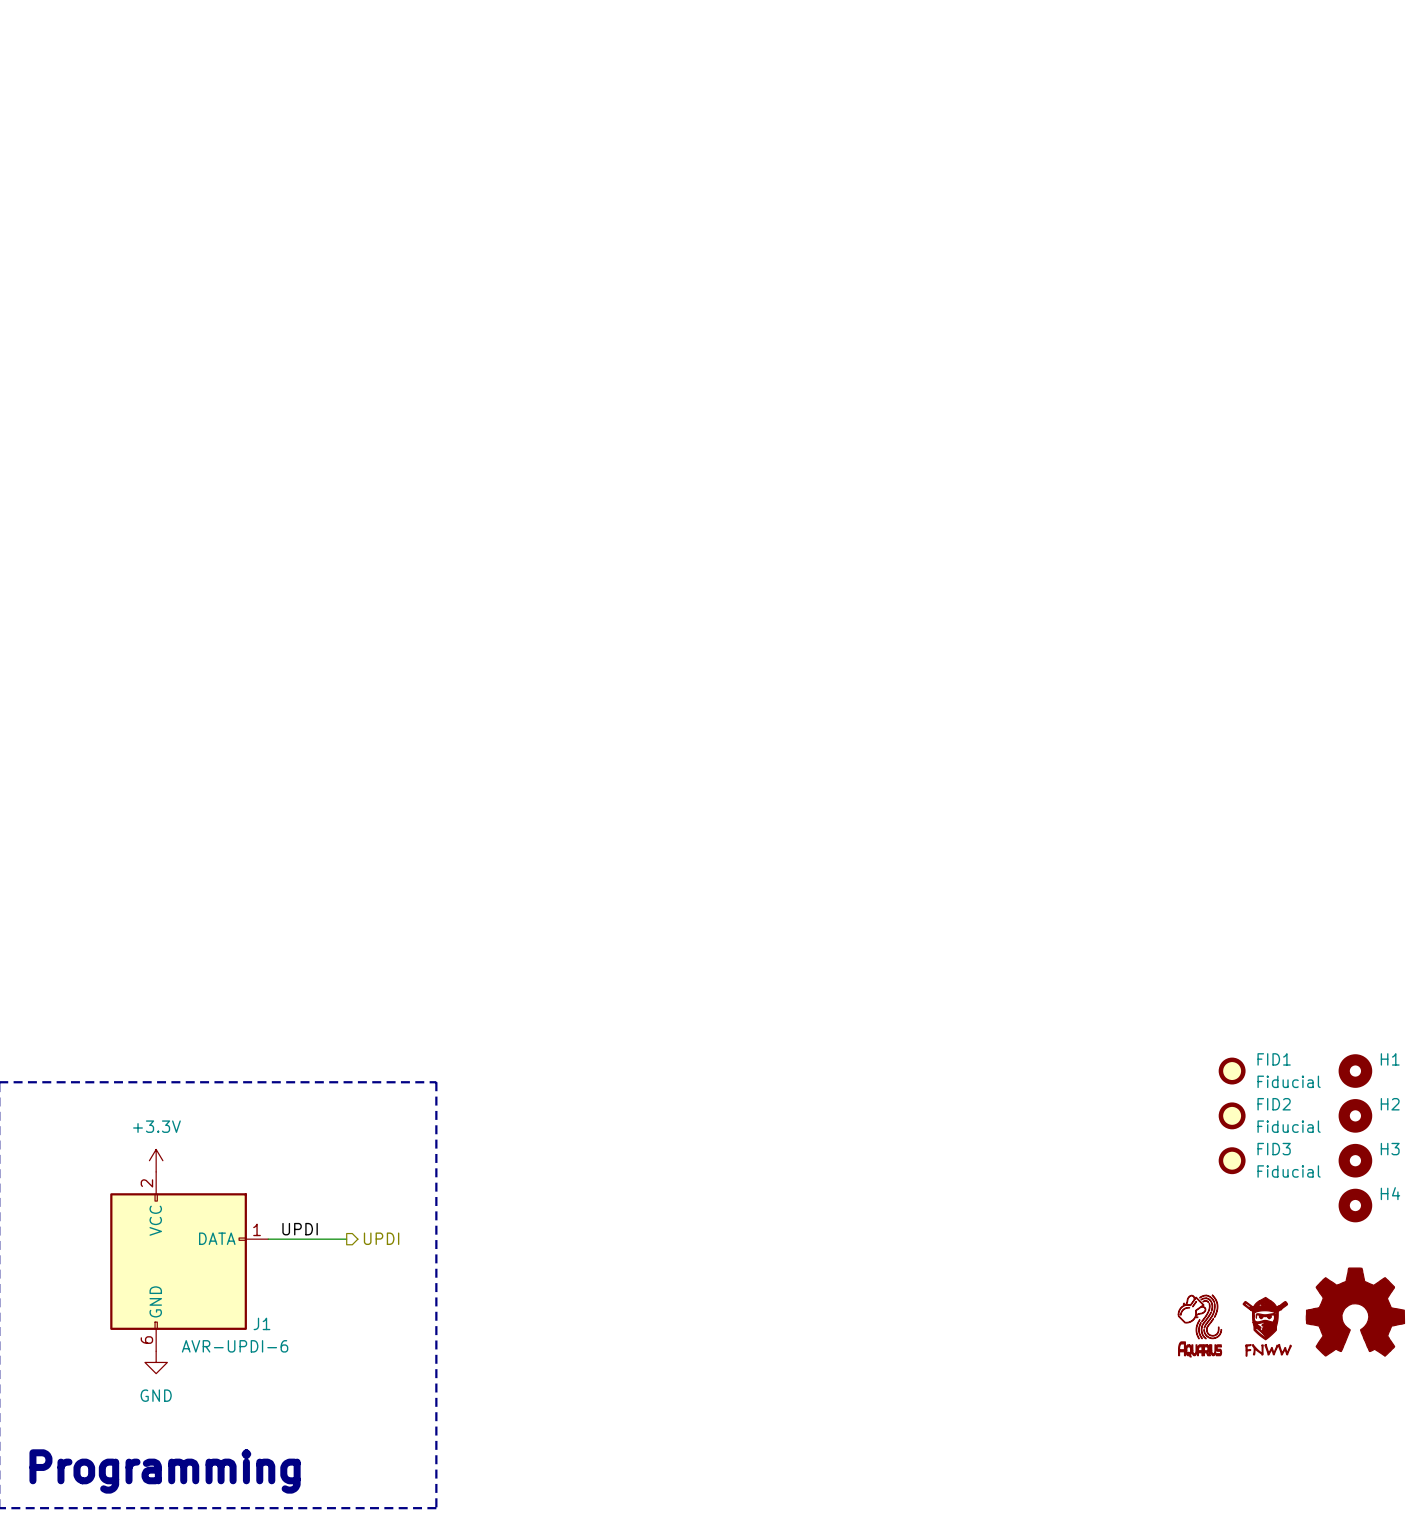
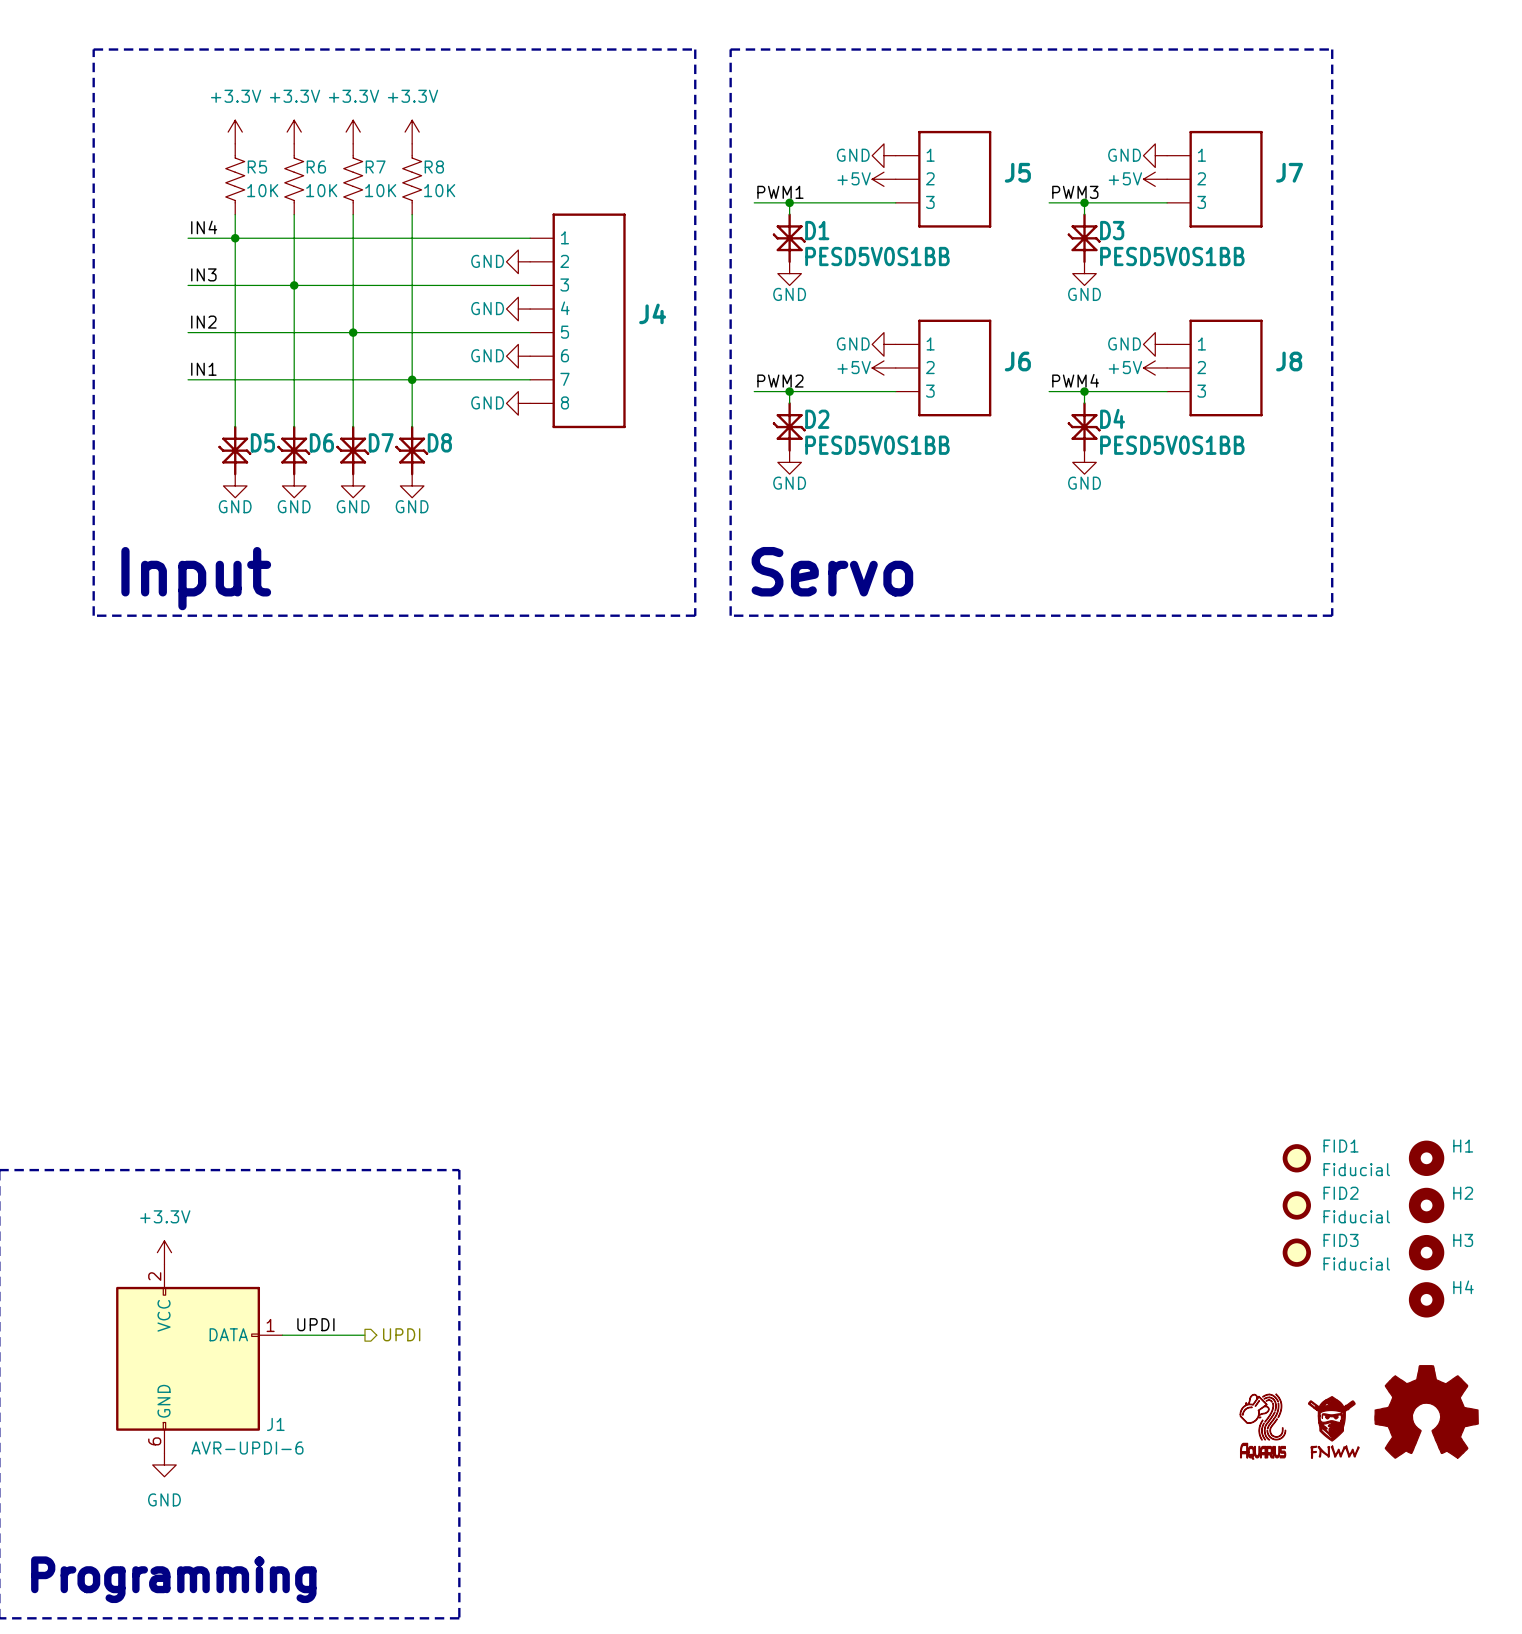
line: none -> (93, 49) (695, 49) (695, 615) (93, 615) (93, 49)
line: none -> (730, 49) (1332, 49) (1332, 615) (730, 615) (730, 49)
power symbol: none -> +3.3V (235, 132)
power symbol: none -> +3.3V (294, 132)
power symbol: none -> +3.3V (353, 132)
power symbol: none -> +3.3V (412, 132)
power symbol: none -> GND (883, 155)
power symbol: none -> GND (1155, 155)
R5: none -> 10K (235, 179)
R6: none -> 10K (294, 179)
R7: none -> 10K (353, 179)
R8: none -> 10K (412, 179)
power symbol: none -> +5V (883, 179)
J5: none -> (943, 179)
power symbol: none -> +5V (1155, 179)
J7: none -> (1214, 179)
label: none -> PWM1 (780, 192)
label: none -> PWM3 (1075, 192)
wire: none -> (754, 202) (895, 202)
wire: none -> (789, 202) (789, 214)
junction: none -> (789, 202)
wire: none -> (1049, 202) (1167, 202)
wire: none -> (1084, 202) (1084, 214)
junction: none -> (1084, 202)
wire: none -> (235, 214) (235, 426)
wire: none -> (294, 214) (294, 426)
wire: none -> (353, 214) (353, 426)
wire: none -> (412, 214) (412, 426)
label: none -> IN4 (204, 227)
wire: none -> (188, 238) (530, 238)
junction: none -> (235, 238)
D1: none -> PESD5V0S1BB (789, 238)
D3: none -> PESD5V0S1BB (1084, 238)
power symbol: none -> GND (518, 261)
power symbol: none -> GND (789, 273)
power symbol: none -> GND (1084, 273)
label: none -> IN3 (203, 274)
wire: none -> (188, 285) (530, 285)
junction: none -> (294, 285)
power symbol: none -> GND (518, 309)
J4: none -> (577, 320)
label: none -> IN2 (203, 322)
wire: none -> (188, 332) (530, 332)
junction: none -> (353, 332)
power symbol: none -> GND (883, 344)
power symbol: none -> GND (1155, 344)
power symbol: none -> GND (518, 356)
power symbol: none -> +5V (883, 367)
J6: none -> (943, 367)
power symbol: none -> +5V (1155, 367)
J8: none -> (1214, 367)
label: none -> IN1 (203, 369)
wire: none -> (188, 379) (530, 379)
junction: none -> (412, 379)
label: none -> PWM2 (780, 381)
label: none -> PWM4 (1075, 380)
wire: none -> (754, 391) (895, 391)
wire: none -> (789, 391) (789, 403)
junction: none -> (789, 391)
wire: none -> (1049, 391) (1167, 391)
wire: none -> (1084, 391) (1084, 403)
junction: none -> (1084, 391)
power symbol: none -> GND (518, 403)
D2: none -> PESD5V0S1BB (789, 426)
D4: none -> PESD5V0S1BB (1084, 426)
D5: none -> (234, 450)
D6: none -> (293, 450)
D7: none -> (352, 450)
D8: none -> (411, 450)
power symbol: none -> GND (789, 462)
power symbol: none -> GND (1084, 462)
power symbol: none -> GND (235, 485)
power symbol: none -> GND (294, 485)
power symbol: none -> GND (353, 485)
power symbol: none -> GND (412, 485)
text: none -> Servo (832, 571)
text: none -> Input (196, 578)

